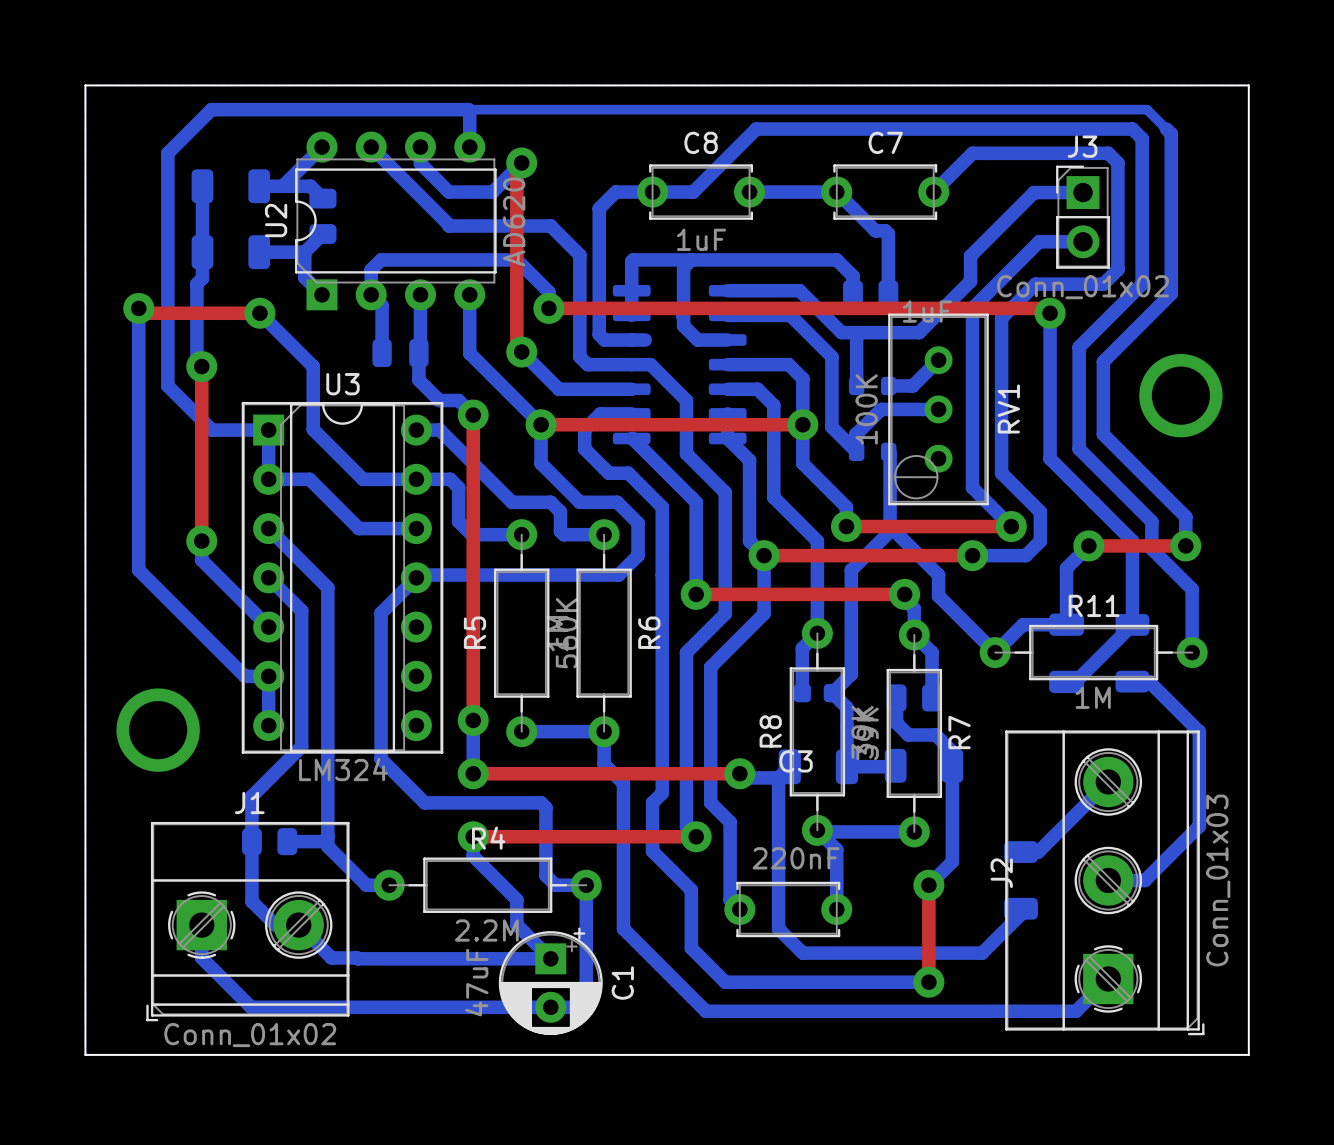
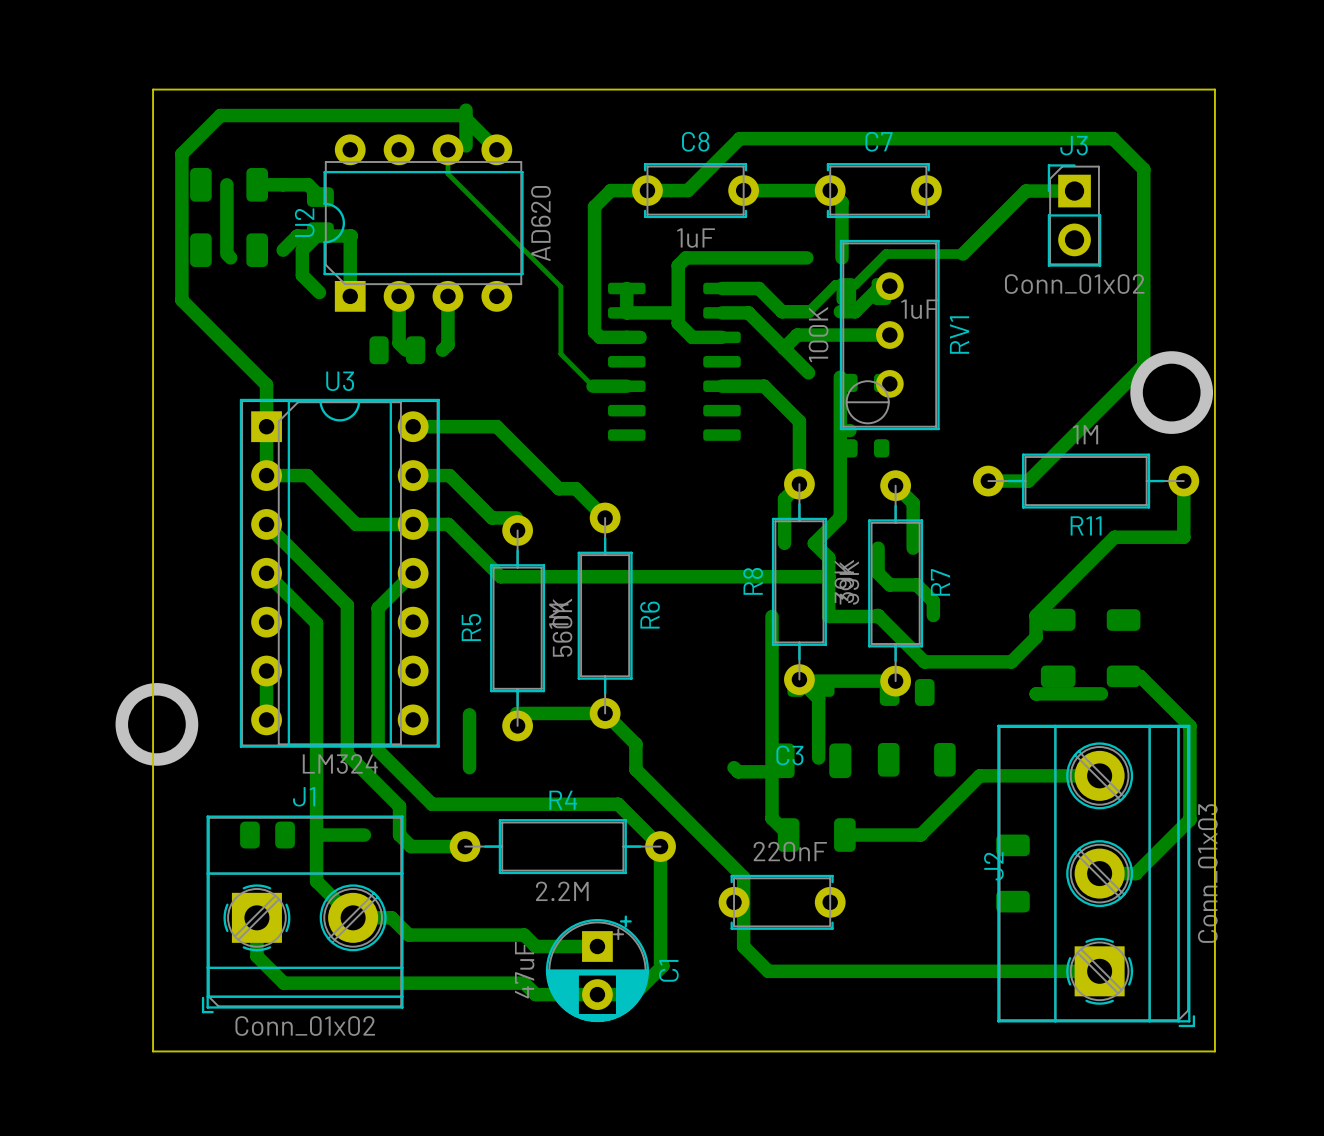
board edge: (85, 85) (1248, 85) (1248, 1054) (85, 1054) (85, 85) -> (153, 89) (153, 1051) (1214, 1051) (1214, 89) (153, 89)
bottom track: (745, 139) (756, 129) (1132, 129) (1142, 138) (1142, 284) (1079, 347) (1079, 448) (1151, 521) (1151, 549) (1192, 589) (1192, 652) -> (739, 138) (1113, 138) (1143, 169) (1143, 365) (1028, 481) (988, 481)
bottom track: (321, 147) (282, 186) -> none
bottom track: (371, 147) (448, 226) (550, 226) (579, 255) (579, 356) (587, 364) (650, 364) (686, 400) (686, 453) (725, 492) (725, 613) (686, 652) (686, 827) (696, 836) -> none
bottom track: (420, 147) (420, 163) (448, 192) (492, 192) (521, 162) -> none
top track: (521, 162) (516, 167) (516, 347) (521, 352) -> none
via: (521, 162) -> none
bottom track: (202, 186) (202, 278) (196, 283) (196, 361) (201, 366) -> none
bottom track: none -> (226, 184) (226, 250)
bottom track: (933, 192) (972, 153) (1108, 153) (1117, 162) (1117, 269) (1103, 284) (1035, 284) (1001, 318) (1001, 473) (1040, 512) (1040, 541) (1025, 555) (972, 555) -> none
bottom track: (848, 203) (875, 230) (885, 230) (888, 234) (888, 293) -> (841, 202) (841, 257)
U2 position: (395, 220) -> (423, 223)
bottom track: (1083, 241) (1039, 241) (972, 308) (972, 487) (1011, 526) -> none
bottom track: (259, 252) (304, 252) -> none
bottom track: none -> (283, 250) (297, 236) (351, 236) (351, 295)
bottom track: none -> (226, 254) (230, 257)
bottom track: (970, 256) (970, 281) (919, 332) (841, 332) (799, 290) (764, 290) -> (962, 254) (886, 254) (855, 284) (835, 284) (808, 311) (782, 311) (758, 288)
bottom track: (691, 259) (633, 259) (631, 290) -> none
bottom track: (813, 259) (836, 259) (853, 276) (853, 293) -> none
bottom track: none -> (889, 286) (880, 286) (855, 311) (840, 311)
bottom track: (420, 294) (418, 380) (439, 400) (458, 400) (473, 415) -> none
bottom track: (469, 294) (469, 353) (541, 424) (541, 463) (579, 502) (617, 502) (638, 523) (638, 555) (618, 575) (419, 575) (416, 577) -> none
bottom track: none -> (399, 296) (399, 343) (406, 350)
bottom track: none -> (447, 296) (447, 344) (442, 350)
top track: (138, 308) (143, 313) (259, 313) -> none
bottom track: (138, 308) (138, 570) (244, 676) (268, 676) -> none
via: (138, 308) -> none
top track: (548, 308) (1045, 308) (1050, 313) -> none
bottom track: (548, 308) (548, 291) (516, 259) (381, 259) (371, 269) (371, 294) (382, 305) (382, 353) -> none
via: (548, 308) -> none
bottom track: (1050, 308) (1050, 458) (1132, 541) (1132, 624) (1075, 681) (1066, 681) -> none
bottom track: (259, 313) (313, 366) (313, 429) (362, 479) (416, 479) -> none
via: (259, 313) -> none
via: (1050, 313) -> none
bottom track: none -> (626, 312) (677, 312)
bottom track: (754, 315) (790, 315) (831, 356) (831, 427) (856, 451) (856, 433) (881, 409) (938, 409) -> (748, 312) (808, 372)
bottom track: (856, 332) (856, 385) -> none
bottom track: none -> (889, 335) (797, 335) (784, 348)
bottom track: (521, 352) (558, 389) (597, 389) -> (447, 149) (447, 173) (560, 286) (560, 354) (593, 386)
via: (521, 352) -> none
bottom track: (938, 360) (912, 385) (888, 385) -> none
bottom track: (727, 364) (788, 364) (802, 378) (802, 463) (846, 507) (846, 526) -> none
top track: (201, 366) (201, 541) -> none
via: (201, 366) -> none
bottom track: none -> (840, 377) (840, 517) (814, 543) (828, 557) (828, 616) (878, 615) (924, 661) (1011, 661) (1036, 637) (1036, 615) (1114, 537) (1183, 537) (1183, 481)
bottom track: (757, 389) (773, 405) (773, 497) (817, 541) (817, 633) (802, 648) (802, 693) -> (751, 386) (764, 386) (799, 421) (799, 484) (784, 499) (784, 543)
RV1 position: (938, 409) -> (889, 335)
bottom track: (631, 413) (600, 413) (584, 429) (584, 448) (608, 473) (628, 473) (662, 507) (662, 793) (652, 802) (652, 851) (691, 890) (691, 948) (725, 982) (928, 982) -> none
bottom track: (727, 413) (727, 438) (749, 460) (749, 541) (764, 555) (764, 613) (710, 667) (710, 802) (730, 822) (730, 899) (739, 909) -> none
top track: (473, 415) (473, 720) -> none
via: (473, 415) -> none
top track: (541, 424) (802, 424) -> none
via: (541, 424) -> none
via: (802, 424) -> none
bottom track: (268, 430) (211, 430) (167, 385) (167, 153) (211, 109) (1147, 109) (1171, 133) (1171, 293) (1103, 361) (1103, 434) (1185, 516) (1185, 545) -> (266, 426) (266, 384) (181, 300) (181, 154) (220, 115) (462, 115) (496, 149)
bottom track: (439, 430) (512, 502) (550, 502) (560, 512) (560, 531) (563, 534) (604, 534) -> (436, 426) (496, 426) (558, 488) (575, 488) (605, 517)
bottom track: (631, 438) (696, 502) (696, 594) -> none
bottom track: (888, 451) (890, 531) (851, 570) (851, 674) (832, 693) (846, 707) (846, 766) (896, 765) -> none
bottom track: (450, 479) (458, 487) (458, 521) (471, 534) (521, 534) -> (446, 475) (449, 475) (492, 517) (516, 517)
bottom track: none -> (895, 485) (913, 503) (913, 548)
top track: (846, 526) (1011, 526) -> none
via: (846, 526) -> none
bottom track: (890, 526) (938, 575) (938, 595) (995, 652) (1023, 624) (1066, 624) (1066, 568) (1088, 545) -> none
via: (1011, 526) -> none
bottom track: none -> (413, 524) (448, 524) (500, 576) (828, 576)
bottom track: (201, 541) (201, 560) (268, 627) -> none
via: (201, 541) -> none
top track: (1088, 545) (1185, 545) -> none
via: (1088, 545) -> none
via: (1185, 545) -> none
bottom track: none -> (878, 548) (878, 573) (889, 584) (916, 584) (933, 601) (933, 615)
top track: (764, 555) (972, 555) -> none
via: (764, 555) -> none
via: (972, 555) -> none
bottom track: (327, 587) (327, 846) (366, 885) (389, 885) -> (325, 583) (347, 605) (347, 754) (399, 806) (399, 835) (411, 846) (465, 846)
top track: (696, 594) (904, 594) -> none
via: (696, 594) -> none
bottom track: (904, 594) (904, 599) (914, 608) (914, 634) (932, 652) (932, 697) -> none
via: (904, 594) -> none
R11 name position: R11 (1094, 605) -> R11 (1086, 525)
bottom track: (301, 610) (301, 746) (251, 796) (251, 901) (275, 925) (298, 925) (331, 957) (550, 958) (516, 924) (516, 899) (473, 856) (473, 836) -> (299, 606) (316, 623) (316, 881) (353, 917) (391, 917) (408, 935) (524, 935) (535, 946) (597, 946)
bottom track: none -> (772, 616) (772, 818) (788, 835)
R6 position: (604, 633) -> (605, 615)
R11 position: (1093, 652) -> (1086, 481)
bottom track: (896, 697) (896, 723) (908, 734) (935, 734) (952, 751) (952, 861) (928, 885) -> none
R11 value position: 1M (1093, 697) -> 1M (1085, 434)
bottom track: none -> (1036, 693) (1101, 693)
via: (473, 720) -> none
bottom track: (521, 731) (604, 731) (604, 764) (623, 783) (623, 928) (665, 971) -> (378, 750) (431, 804) (618, 804) (660, 846) (660, 963)
R8 position: (817, 731) -> (799, 581)
R7 position: (914, 733) -> (895, 583)
bottom track: (381, 756) (381, 759) (424, 802) (541, 802) (545, 807) (545, 875) (555, 885) (586, 885) (586, 1004) (583, 1007) (251, 1007) (201, 957) (201, 925) -> none
bottom track: (789, 766) (778, 777) (778, 928) (802, 953) (982, 953) (1020, 914) (1020, 908) -> none
top track: (473, 773) (739, 773) -> none
via: (473, 773) -> none
via: (739, 773) -> none
bottom track: (1108, 782) (1038, 852) (1020, 852) -> (1099, 775) (979, 775) (920, 835) (844, 835)
bottom track: (817, 830) (836, 849) (836, 909) -> (799, 679) (818, 698) (818, 758)
bottom track: (818, 831) (914, 831) -> (800, 681) (895, 681)
bottom track: (327, 836) (322, 841) (287, 841) -> none
top track: (473, 836) (696, 836) -> none
via: (473, 836) -> none
via: (696, 836) -> none
bottom track: none -> (316, 831) (320, 835) (364, 835)
part: none -> (816, 835)
R4 position: (487, 885) -> (562, 846)
top track: (928, 885) (928, 982) -> none
via: (928, 885) -> none
J1 position: (247, 921) -> (302, 914)
bottom track: none -> (256, 917) (256, 956) (283, 983) (524, 983) (535, 994) (634, 994) (662, 965)
bottom track: (668, 973) (705, 1011) (1076, 1011) (1108, 978) -> (516, 713) (605, 713) (635, 744) (635, 769) (743, 877) (743, 946) (768, 971) (1099, 971)
C1 position: (550, 981) -> (597, 968)
via: (928, 982) -> none

